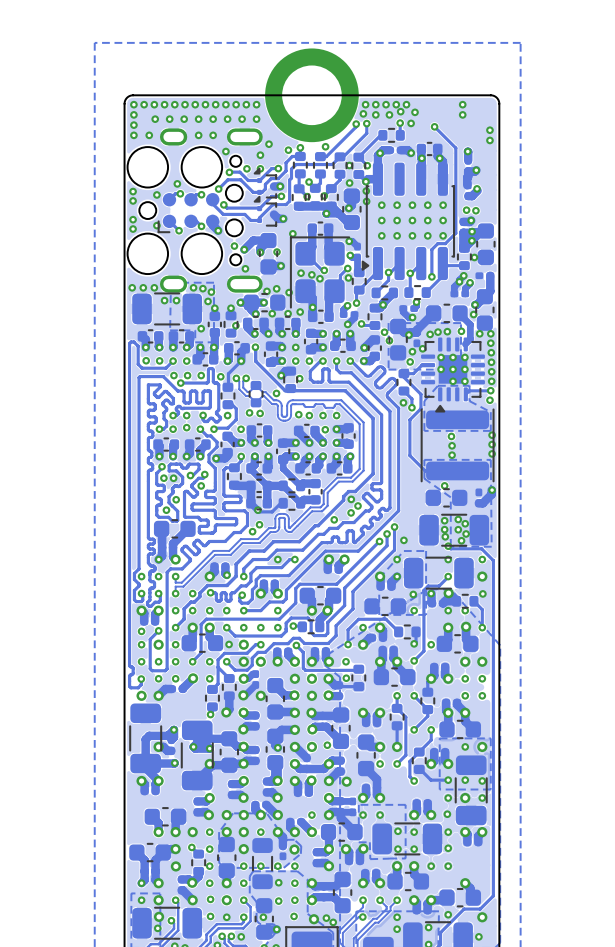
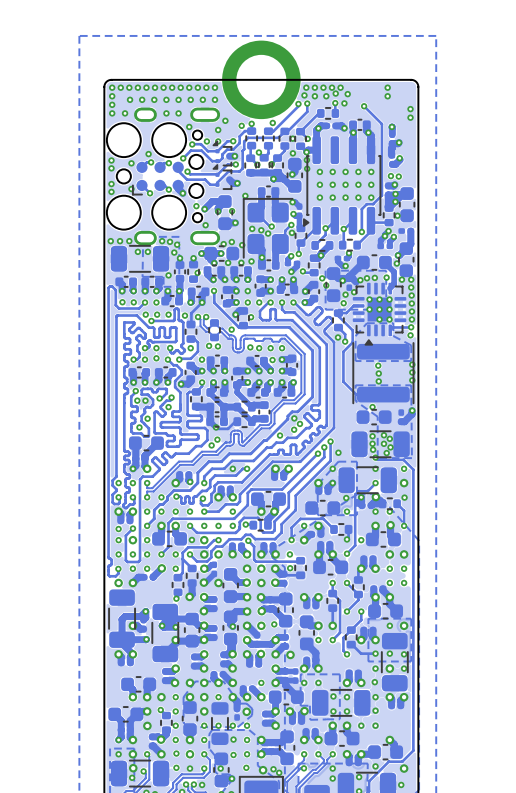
track: none -> (349, 278) (352, 278) (356, 282)

